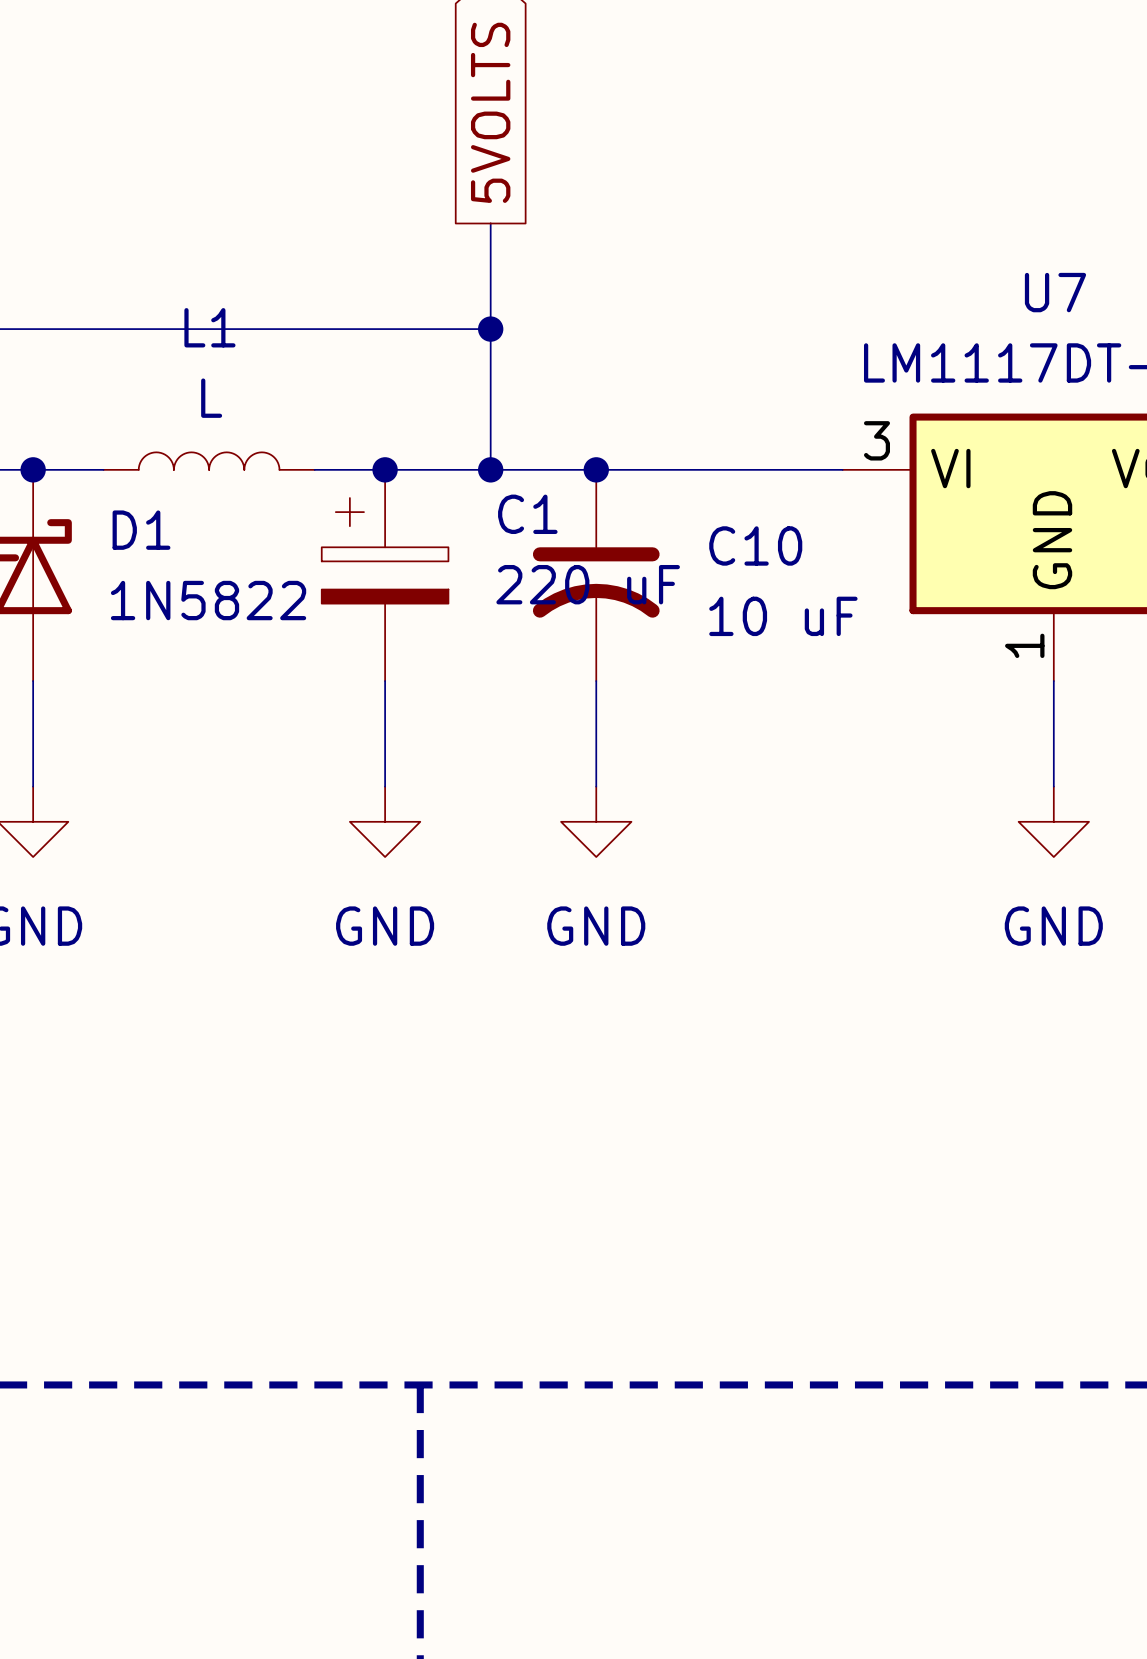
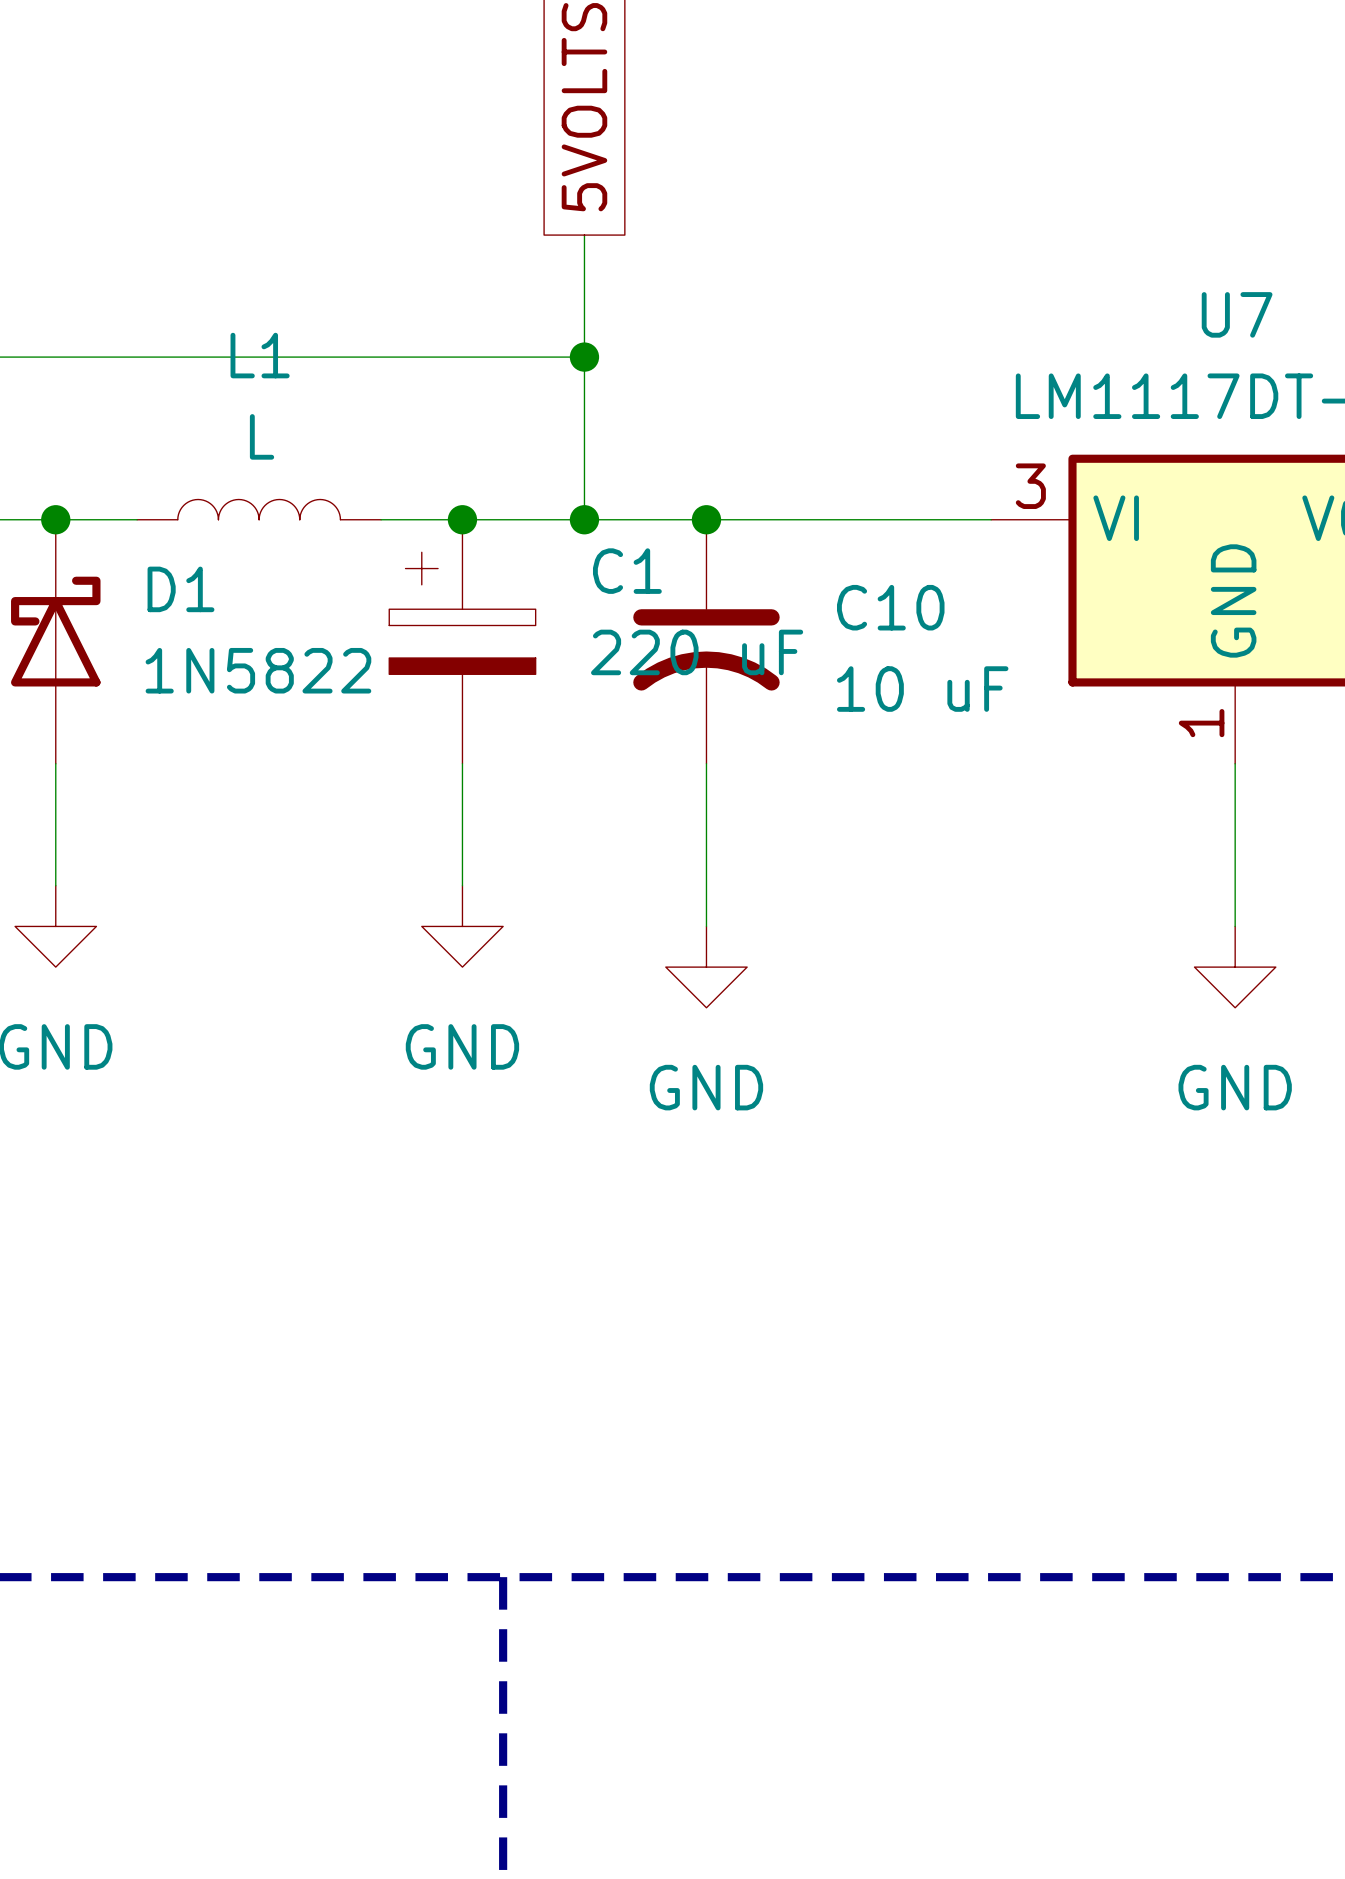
power symbol position: GND (596, 821) -> GND (706, 967)
power symbol position: GND (1053, 821) -> GND (1235, 967)

